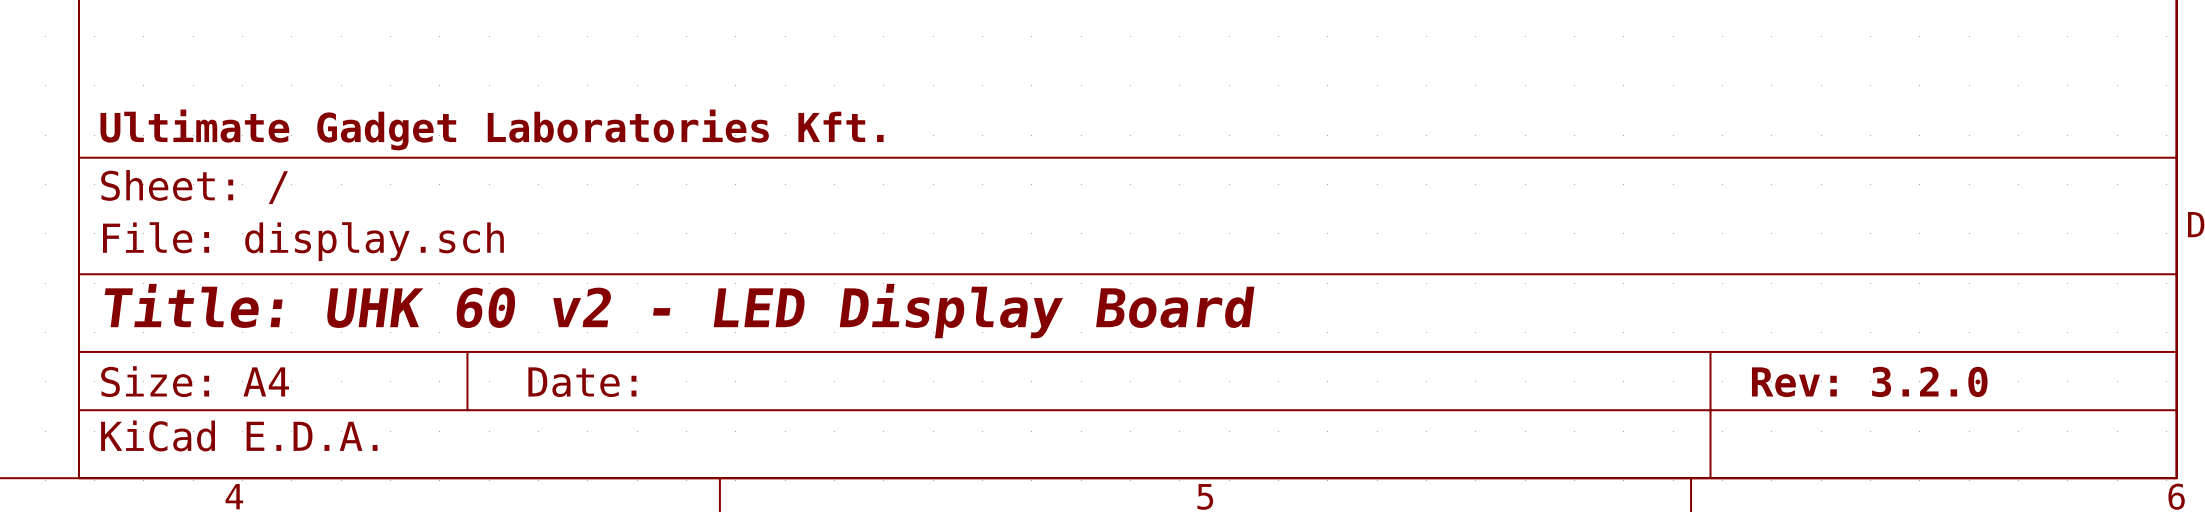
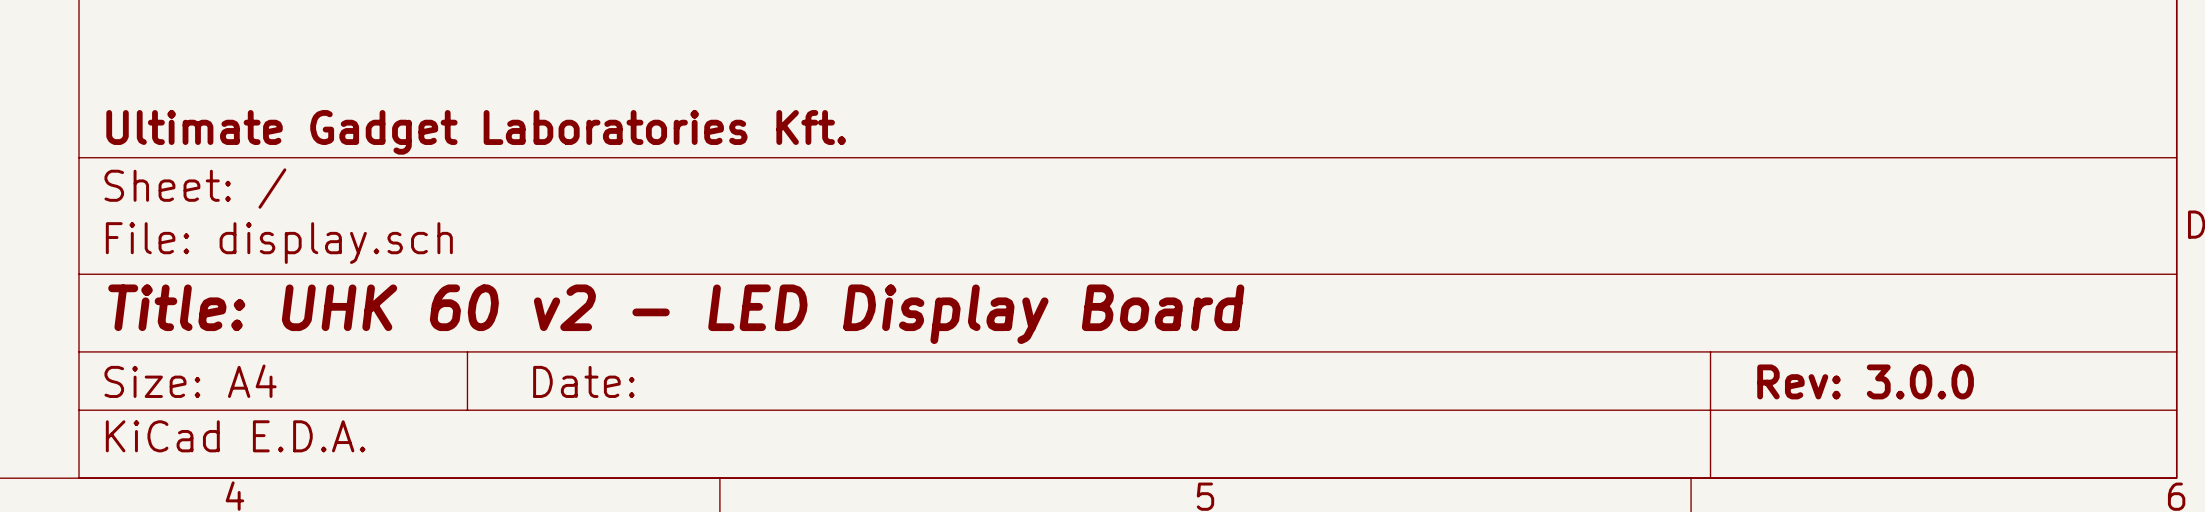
title block: Rev: 3.2.0 (1869, 381) -> Rev: 3.0.0 (1865, 381)

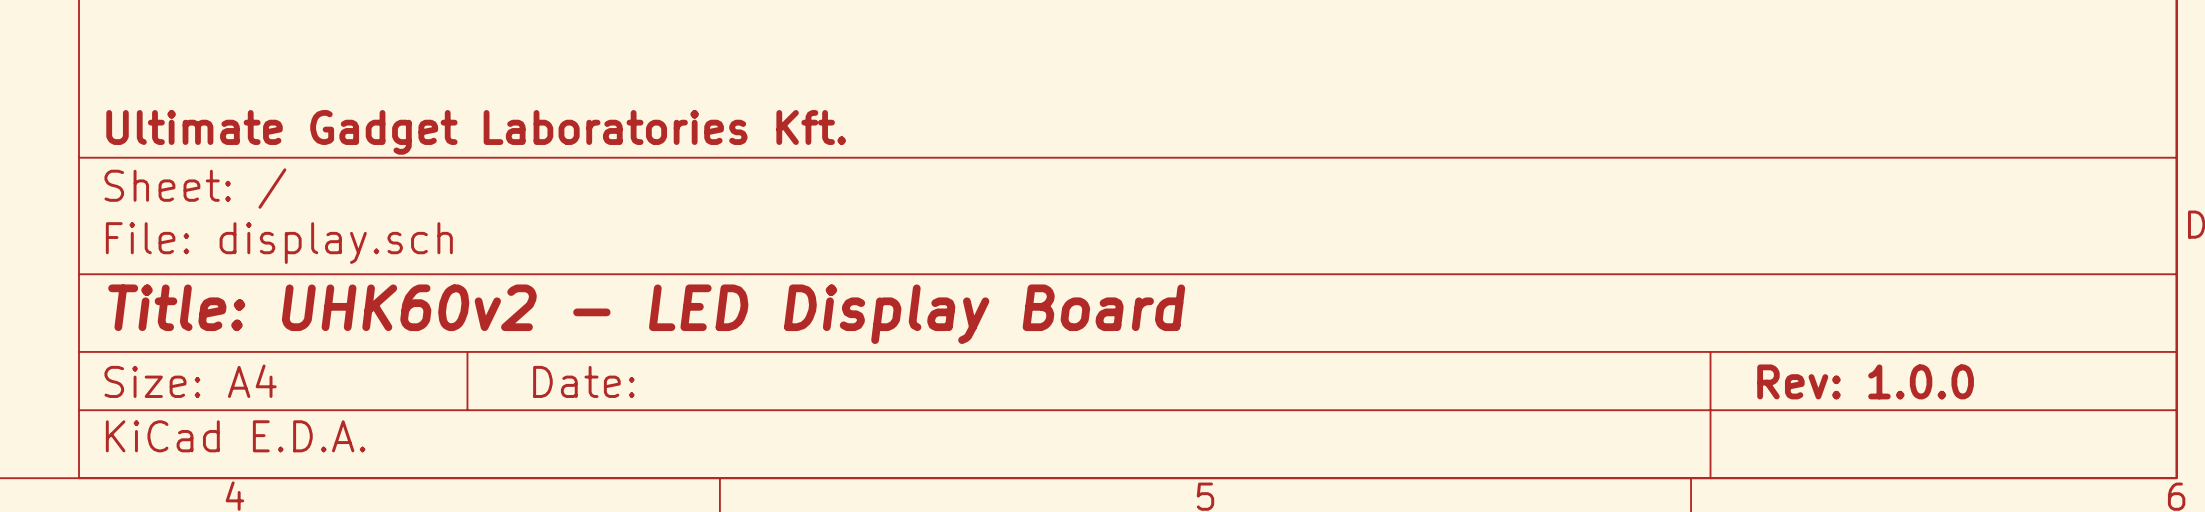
title block: Title: UHK 60 v2 - LED Display Board (676, 314) -> Title: UHK60v2 - LED Display Board (646, 314)
title block: Rev: 3.0.0 (1865, 381) -> Rev: 1.0.0 (1865, 381)

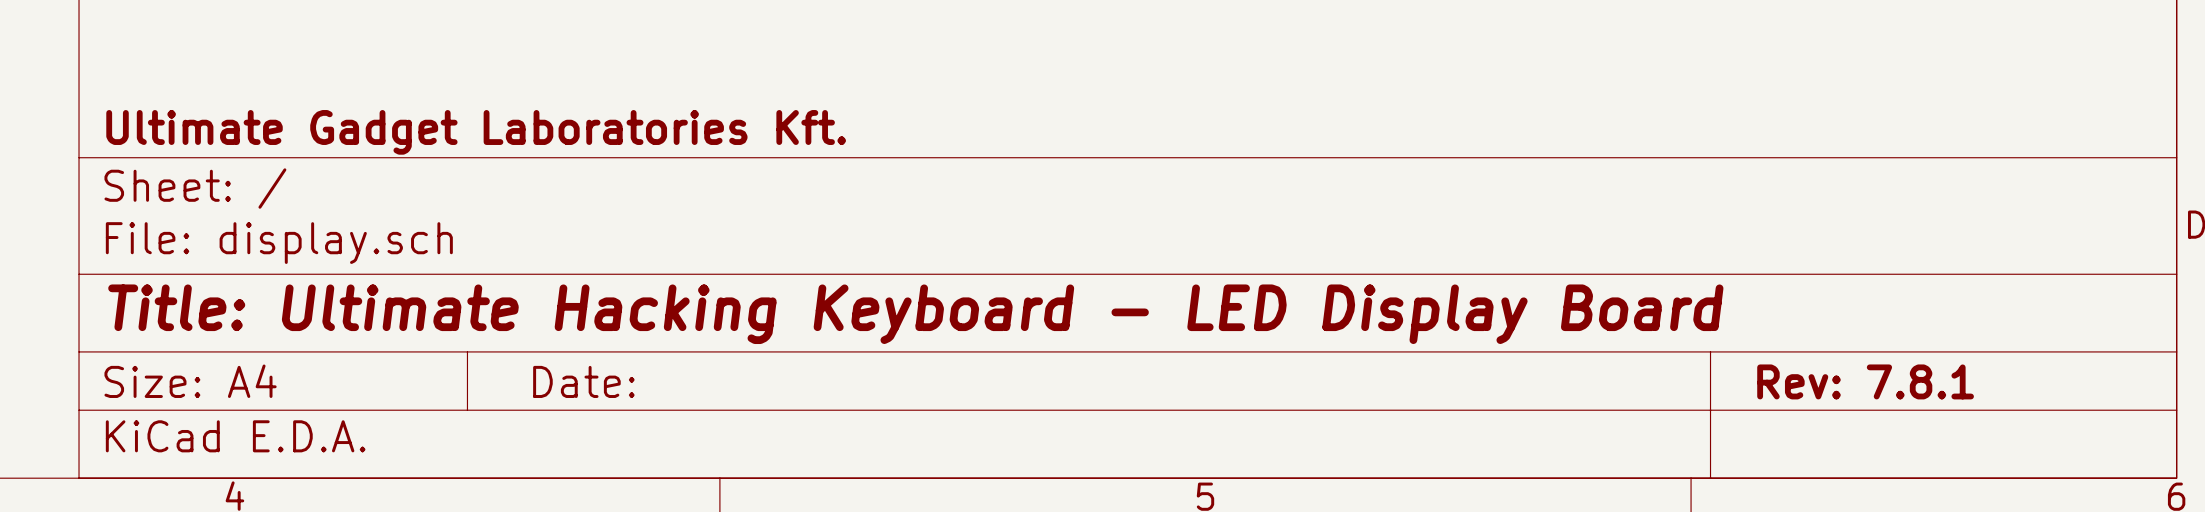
title block: Title: UHK60v2 - LED Display Board (646, 314) -> Title: Ultimate Hacking Keyboard - LED Display Board (915, 314)
title block: Rev: 1.0.0 (1865, 381) -> Rev: 7.8.1 (1865, 381)

